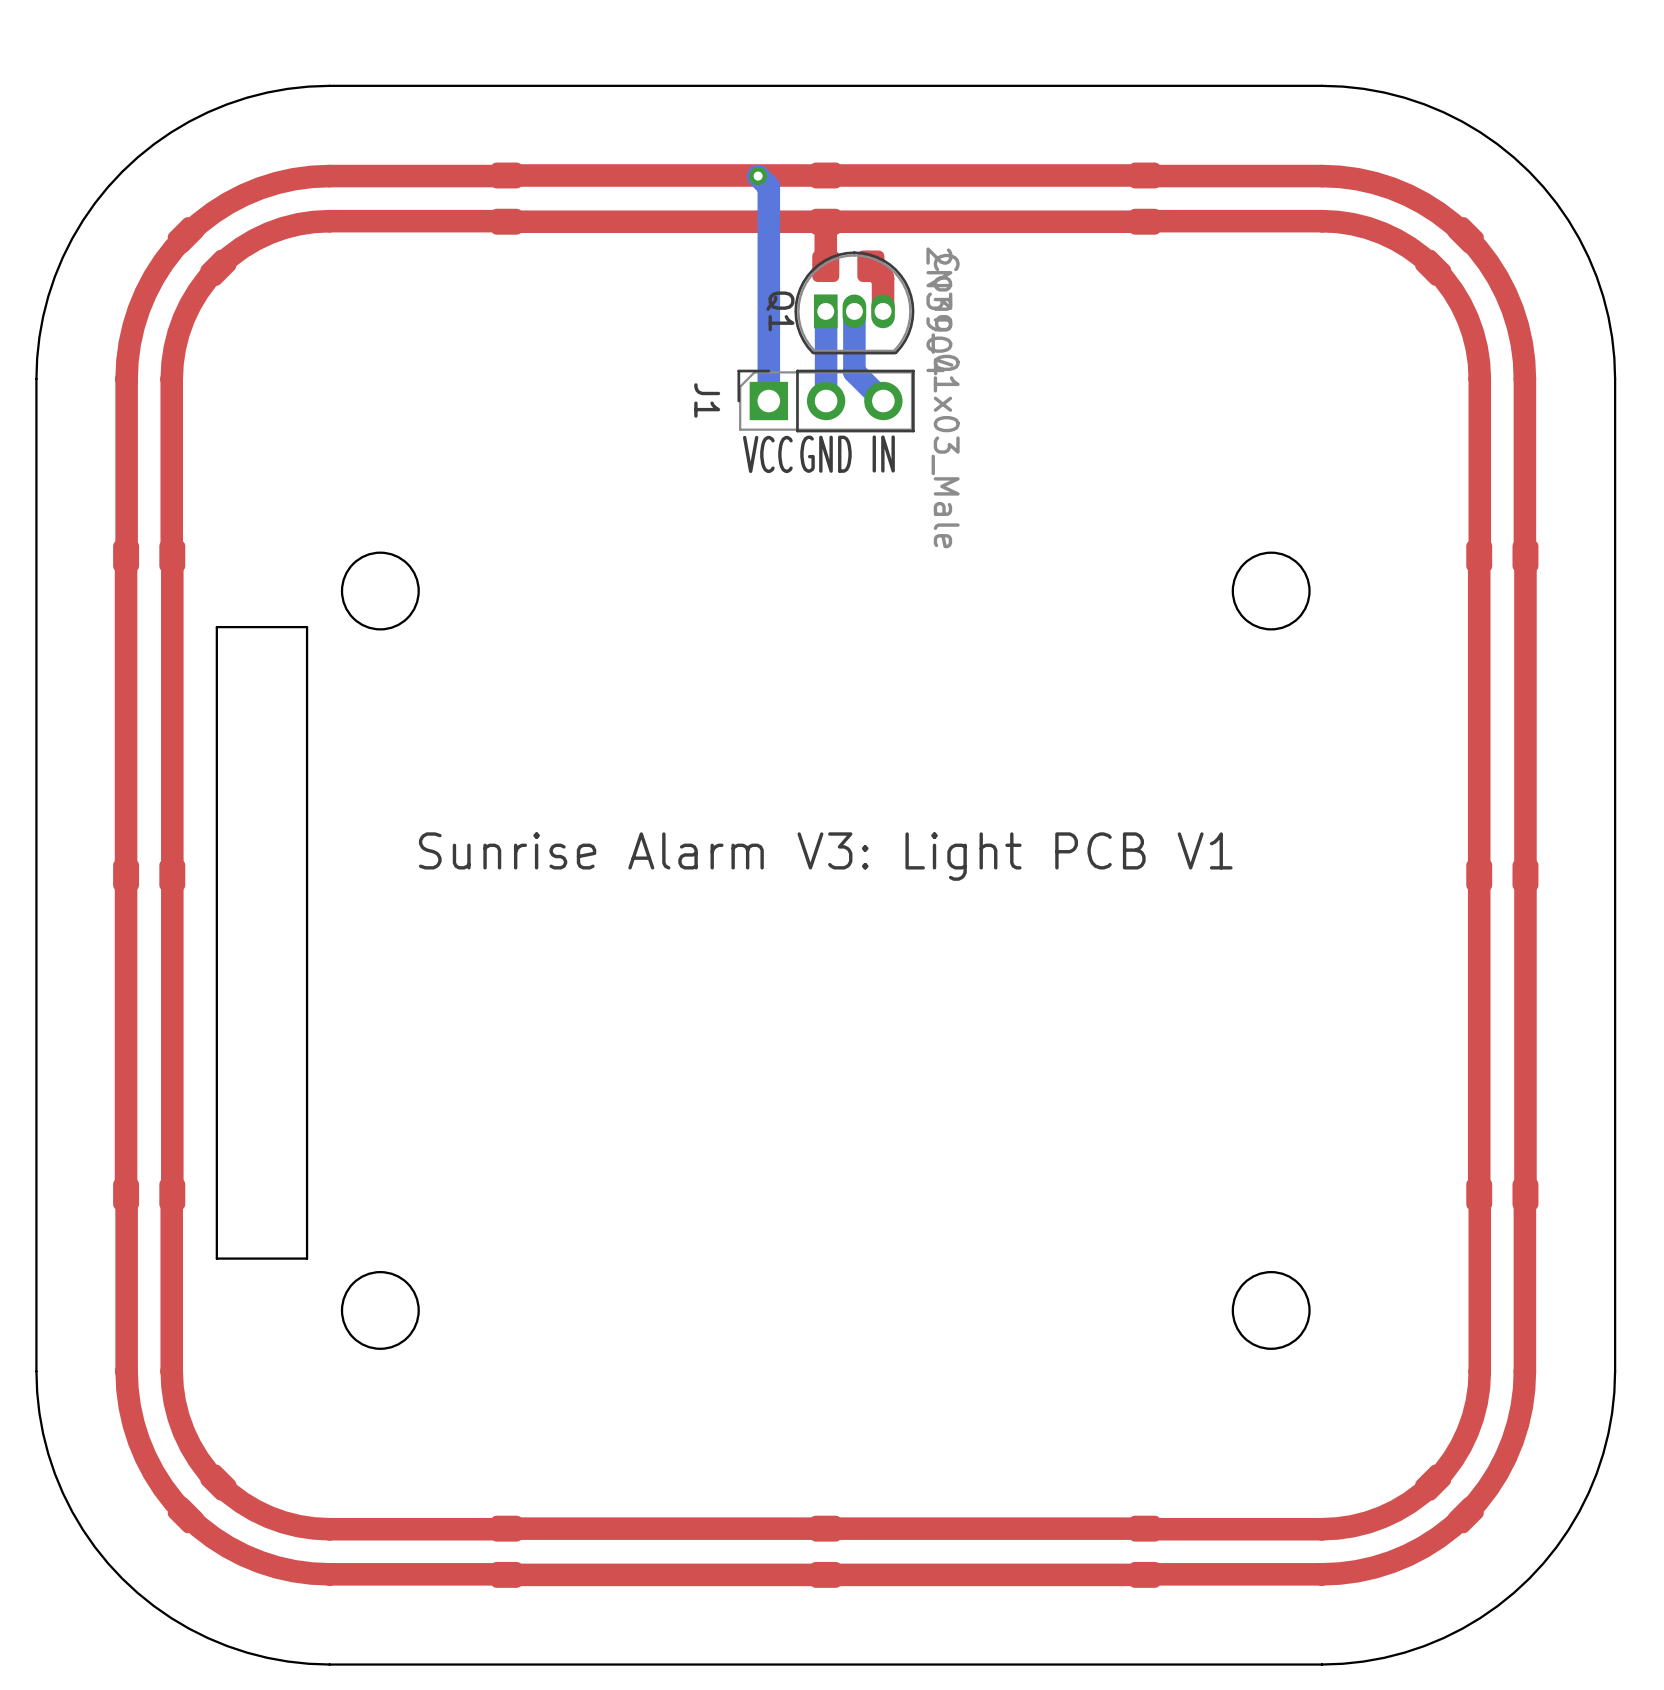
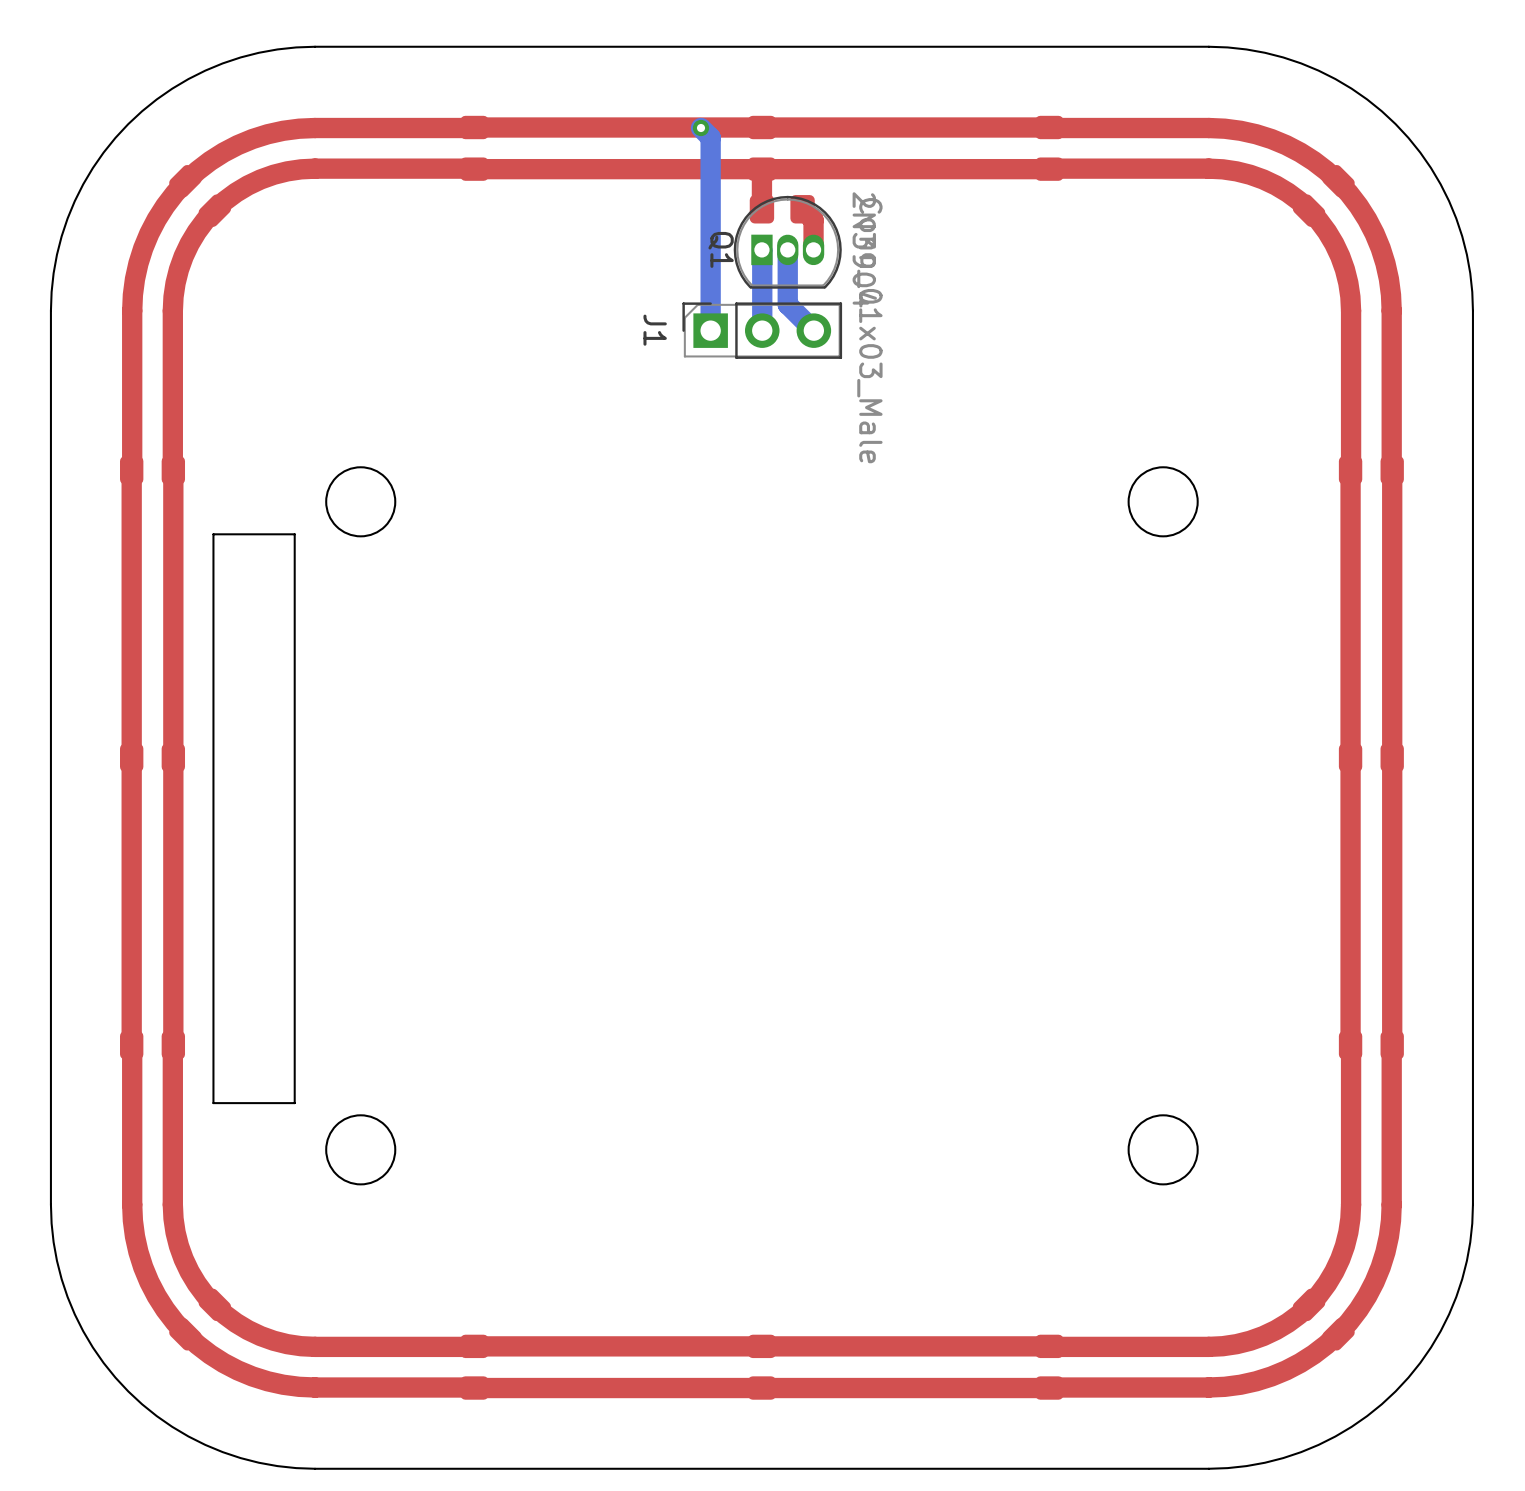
text: IN (883, 453) -> none
text: VCC (767, 454) -> none
text: GND (825, 454) -> none
text: Sunrise Alarm V3: Light PCB V1 (825, 856) -> none

